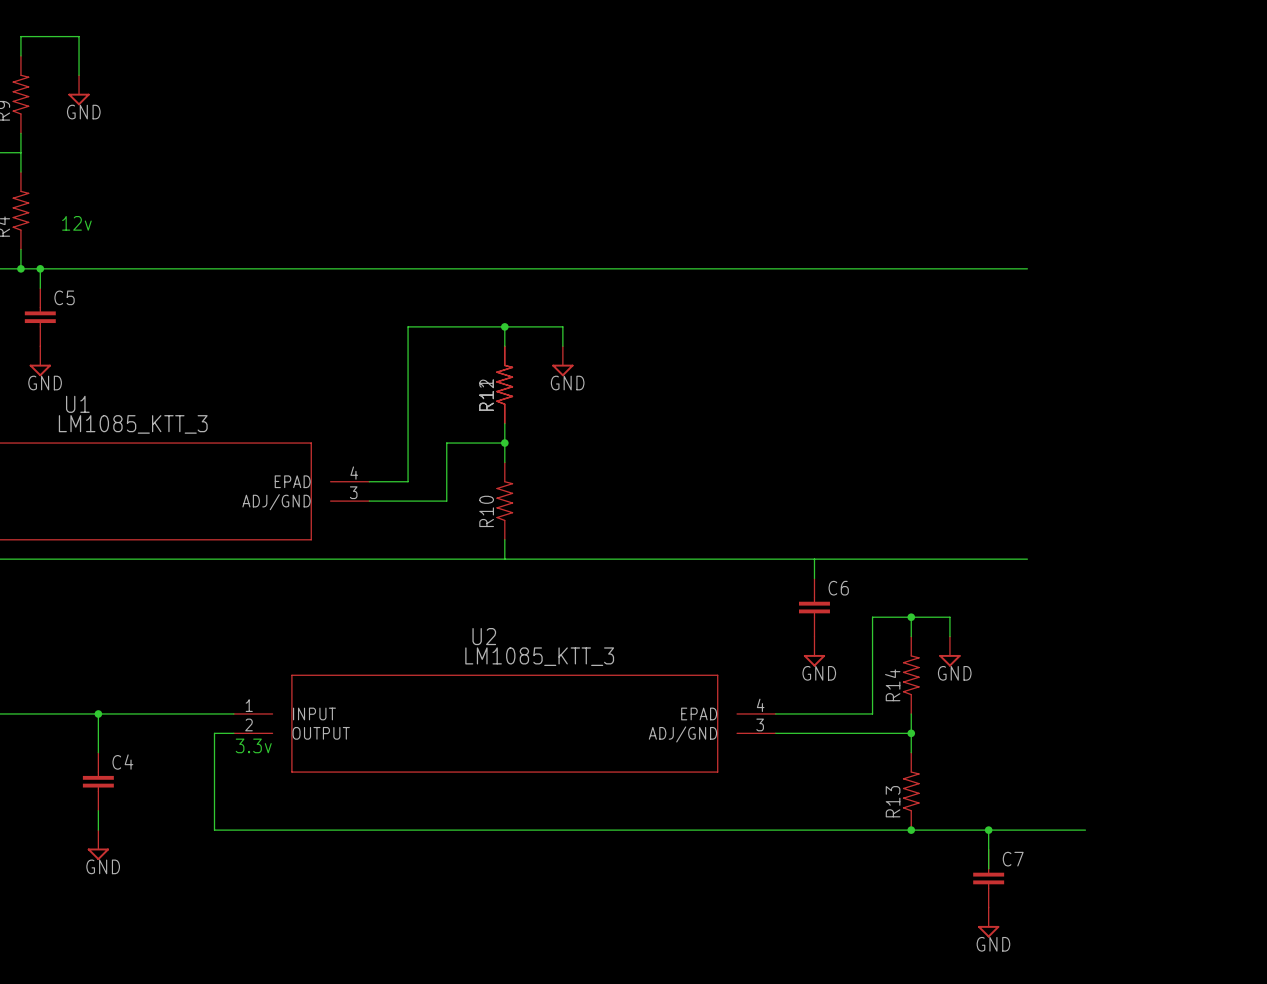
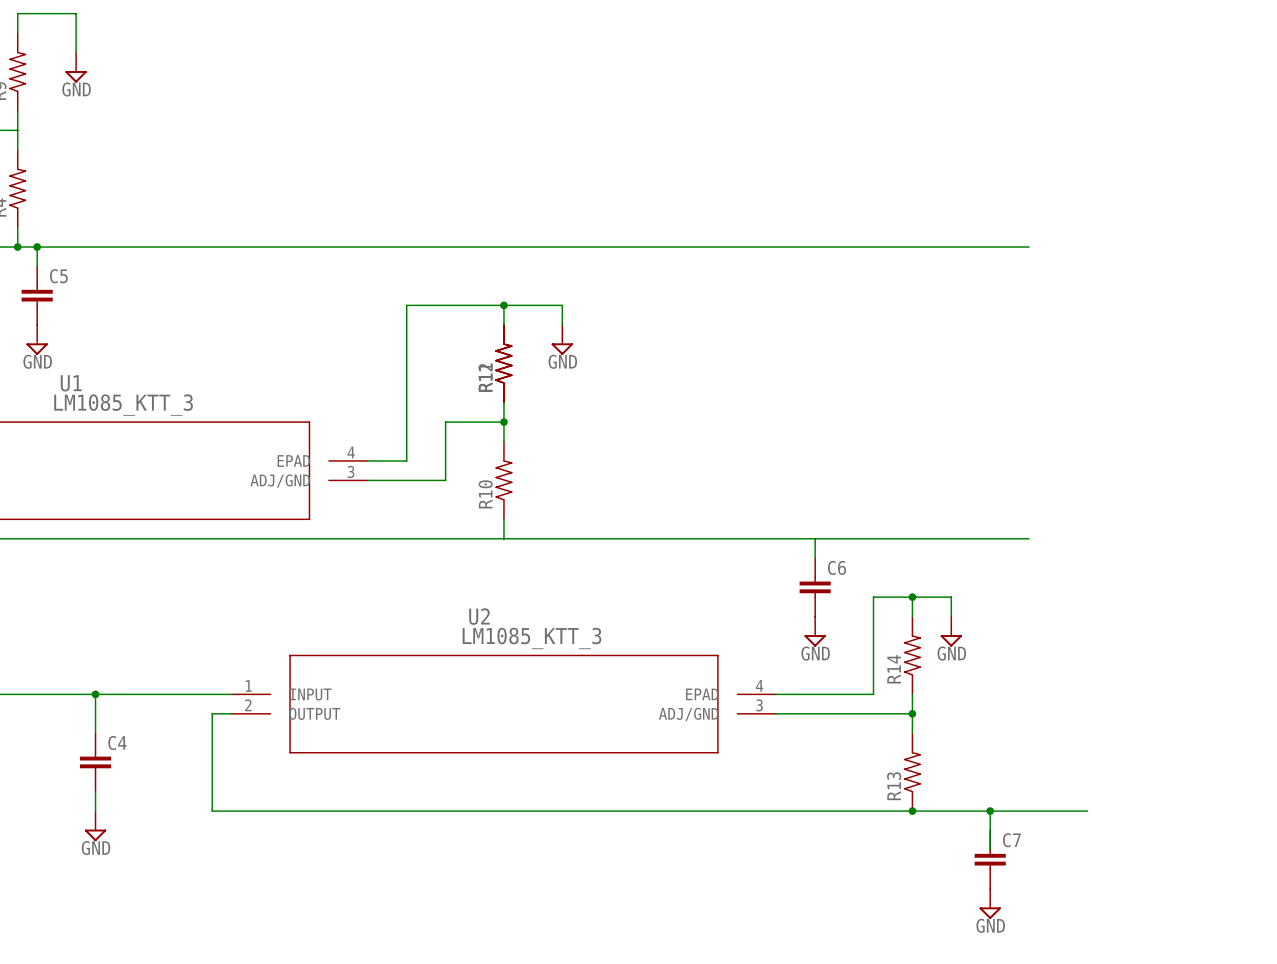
text: 12v (76, 223) -> none
text: 3.3v (253, 745) -> none

